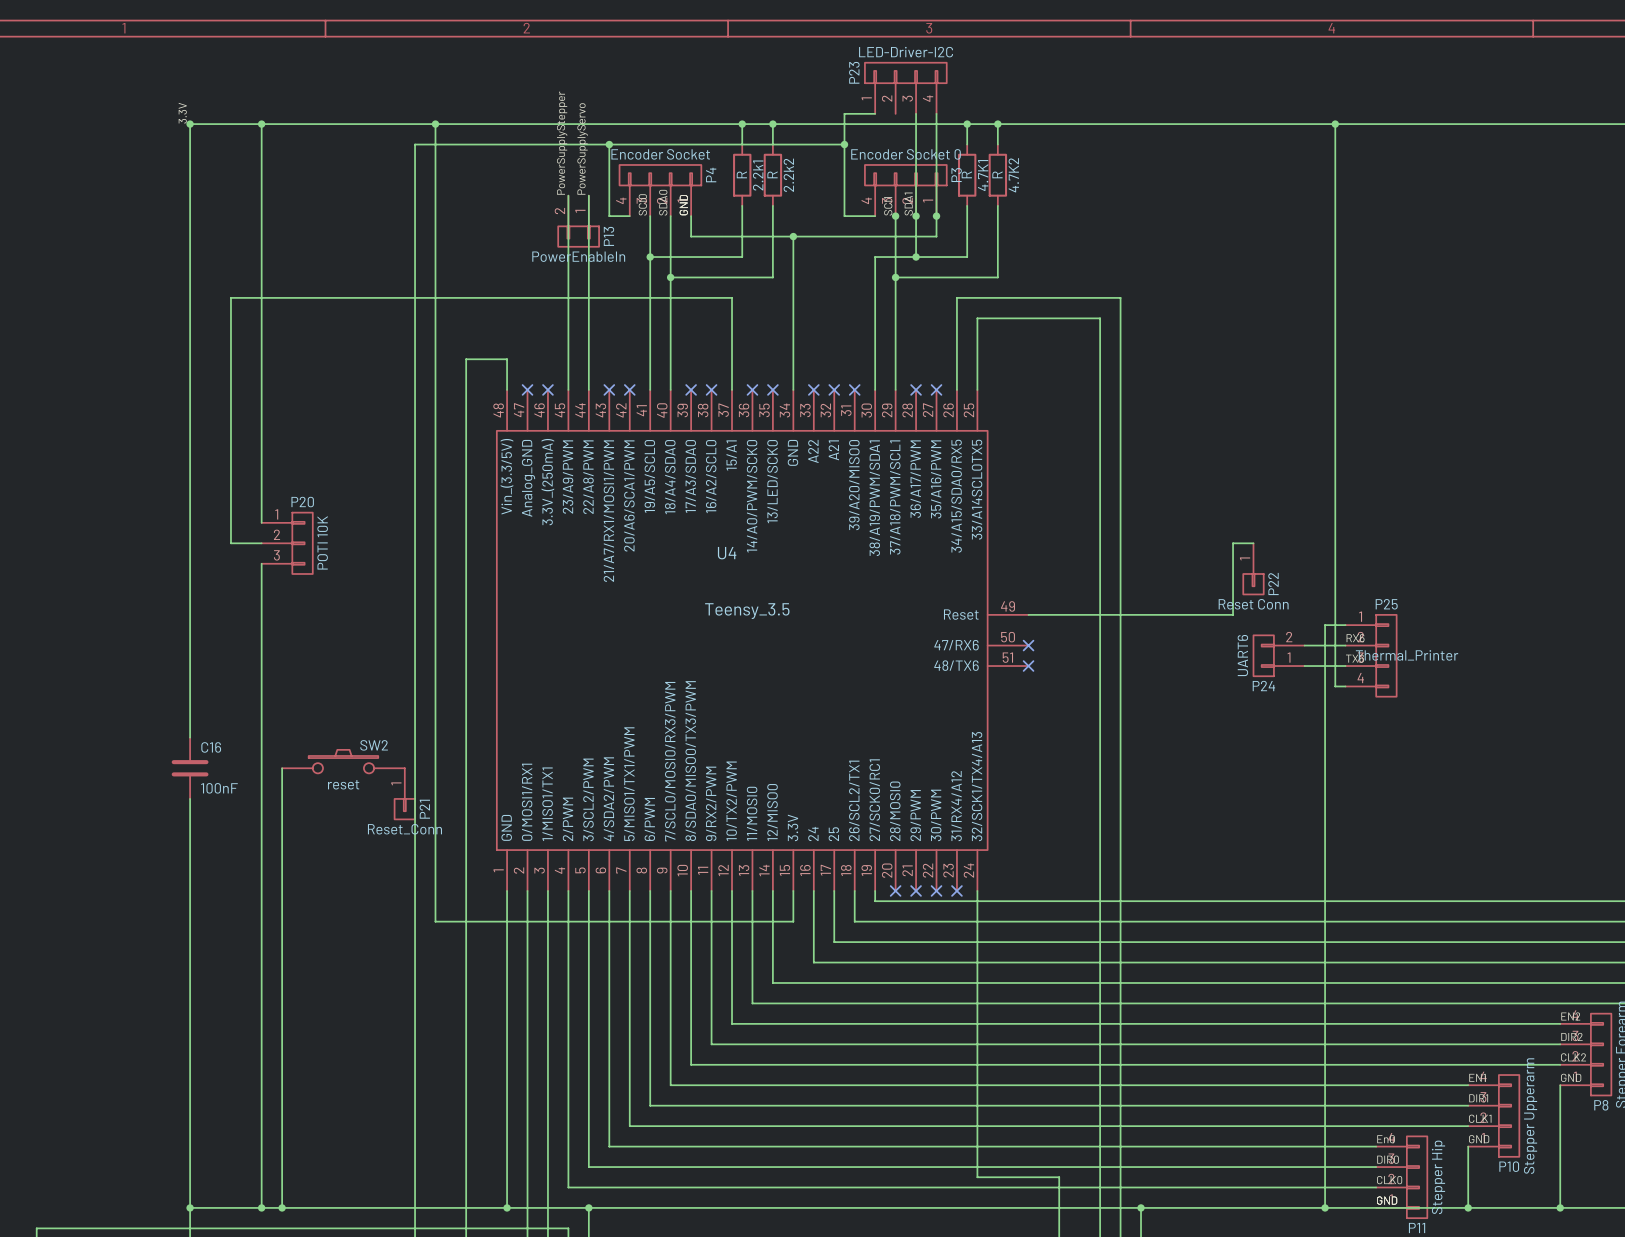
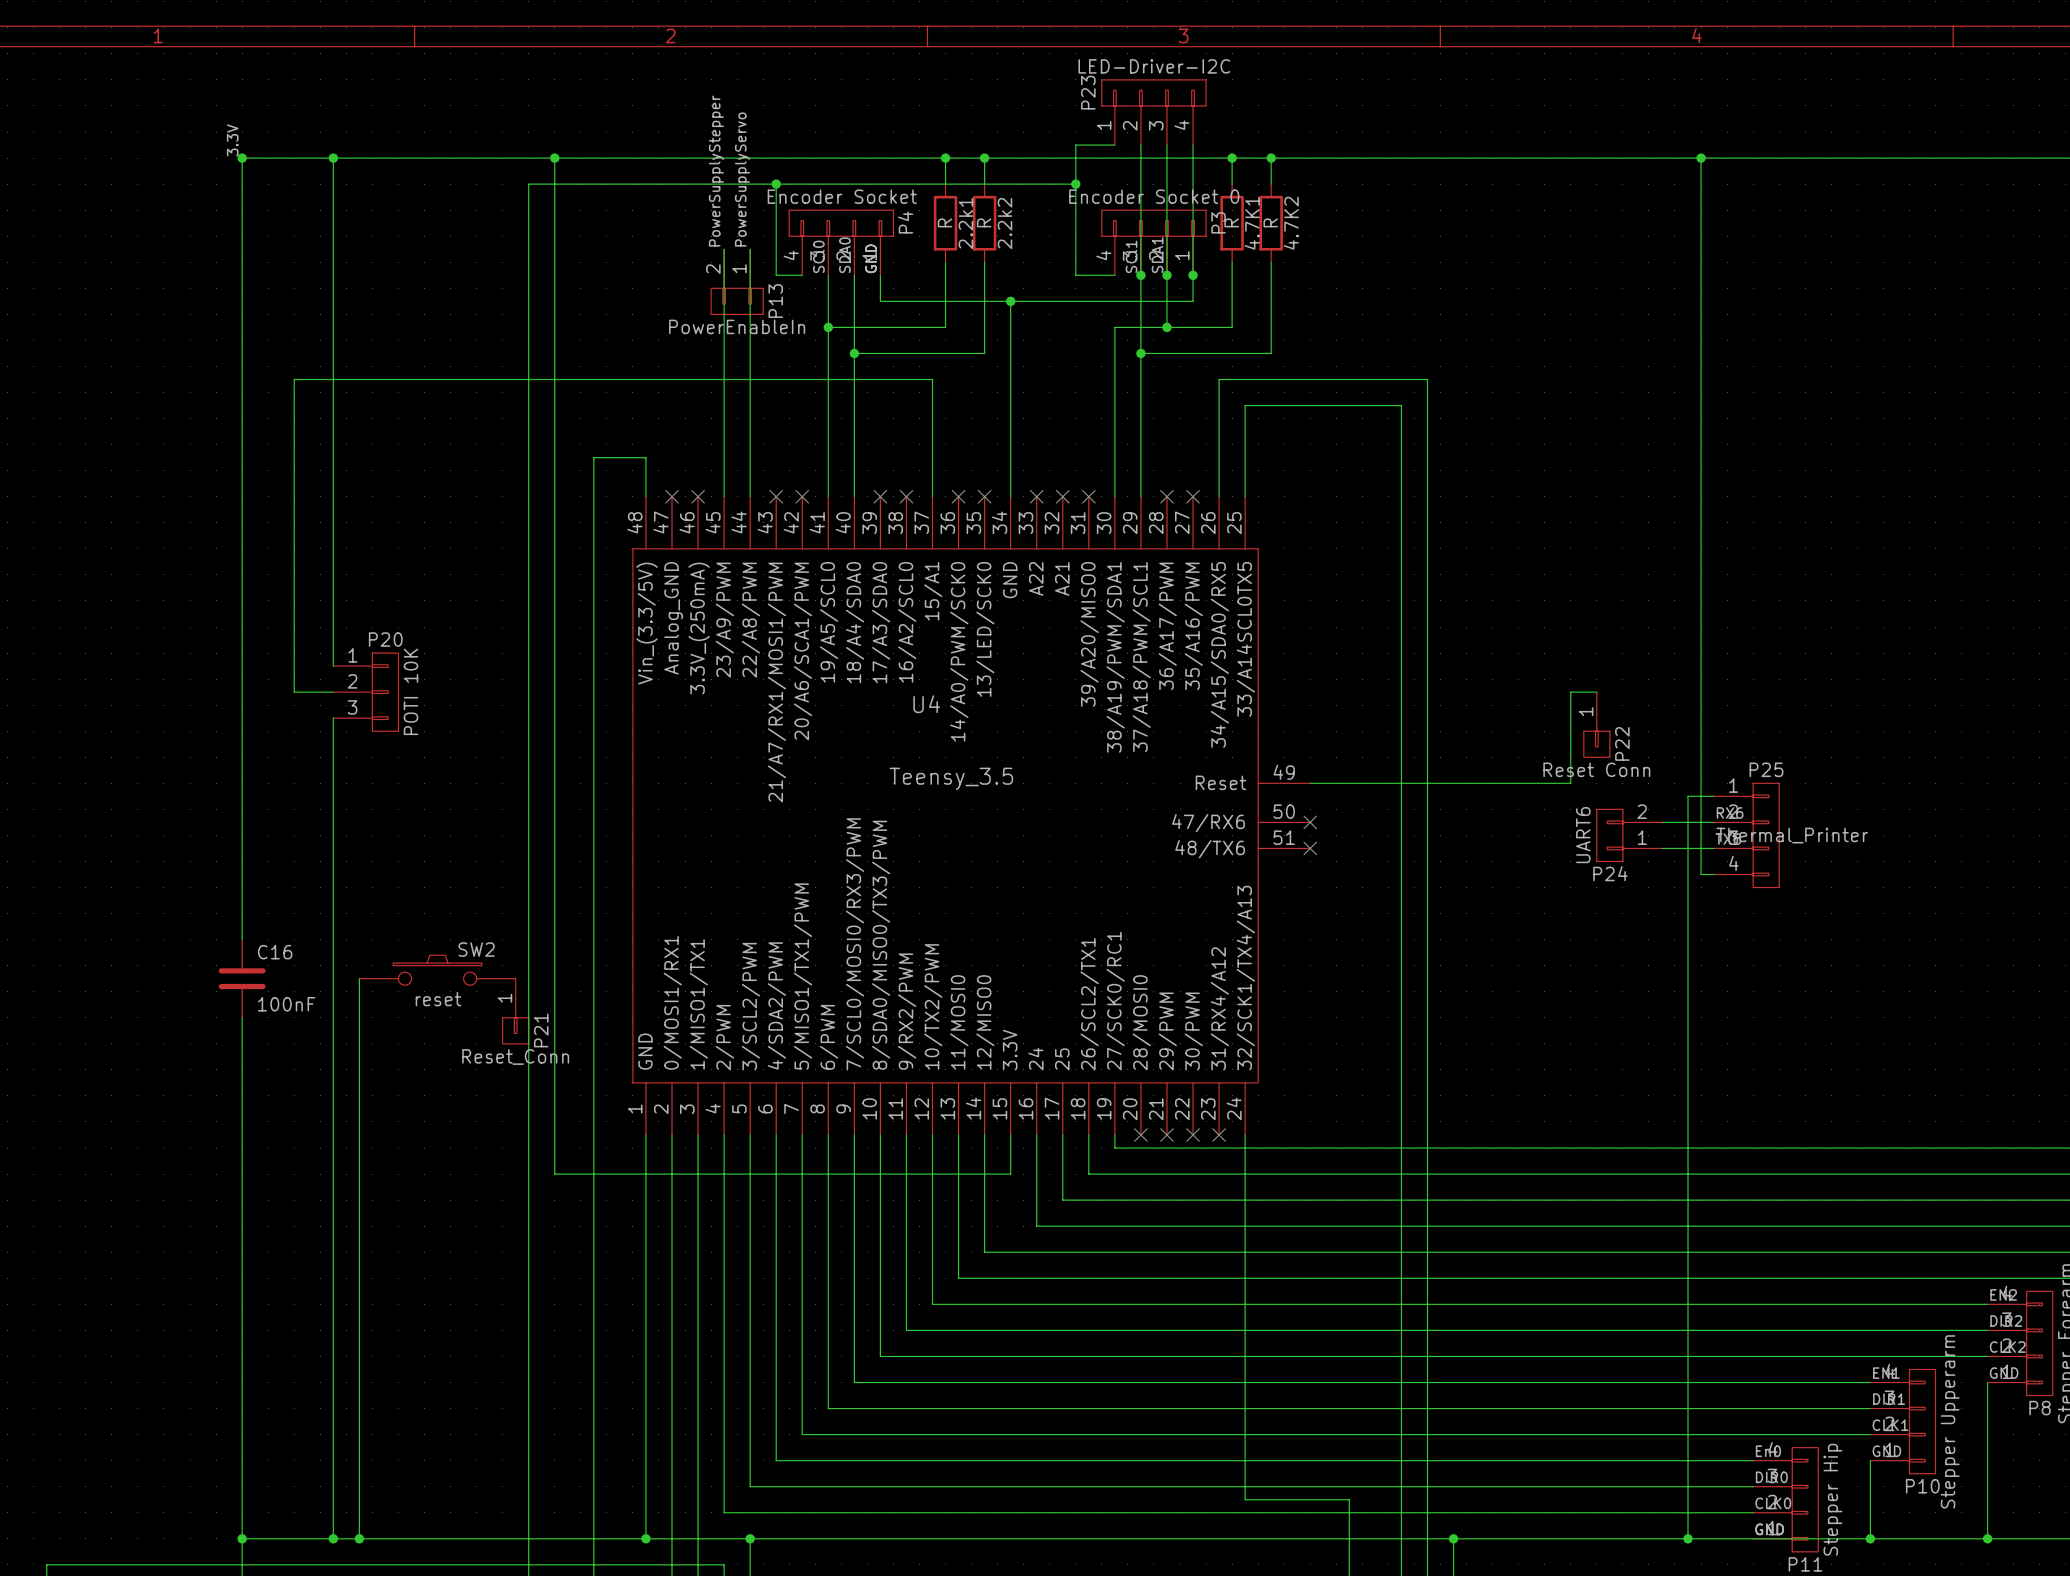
wire: none -> (1140, 145) (1140, 275)

